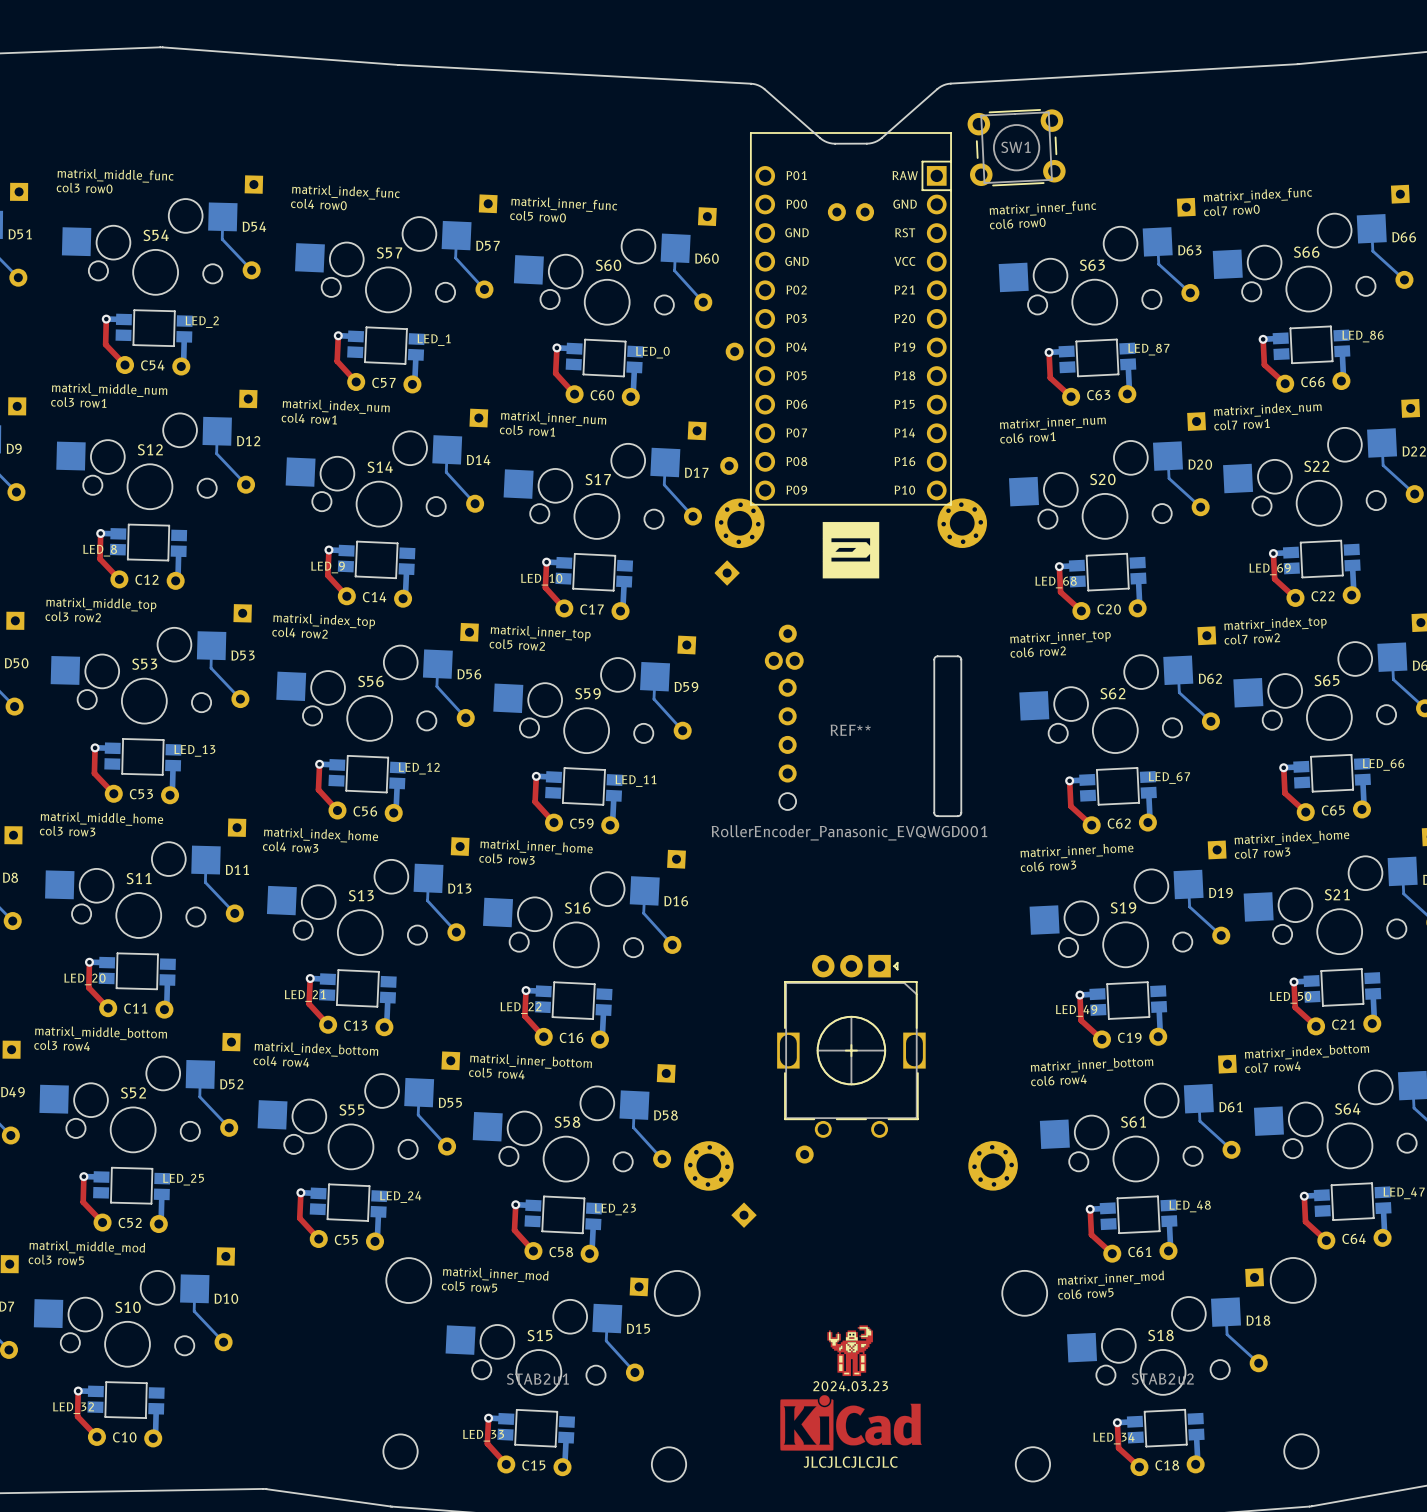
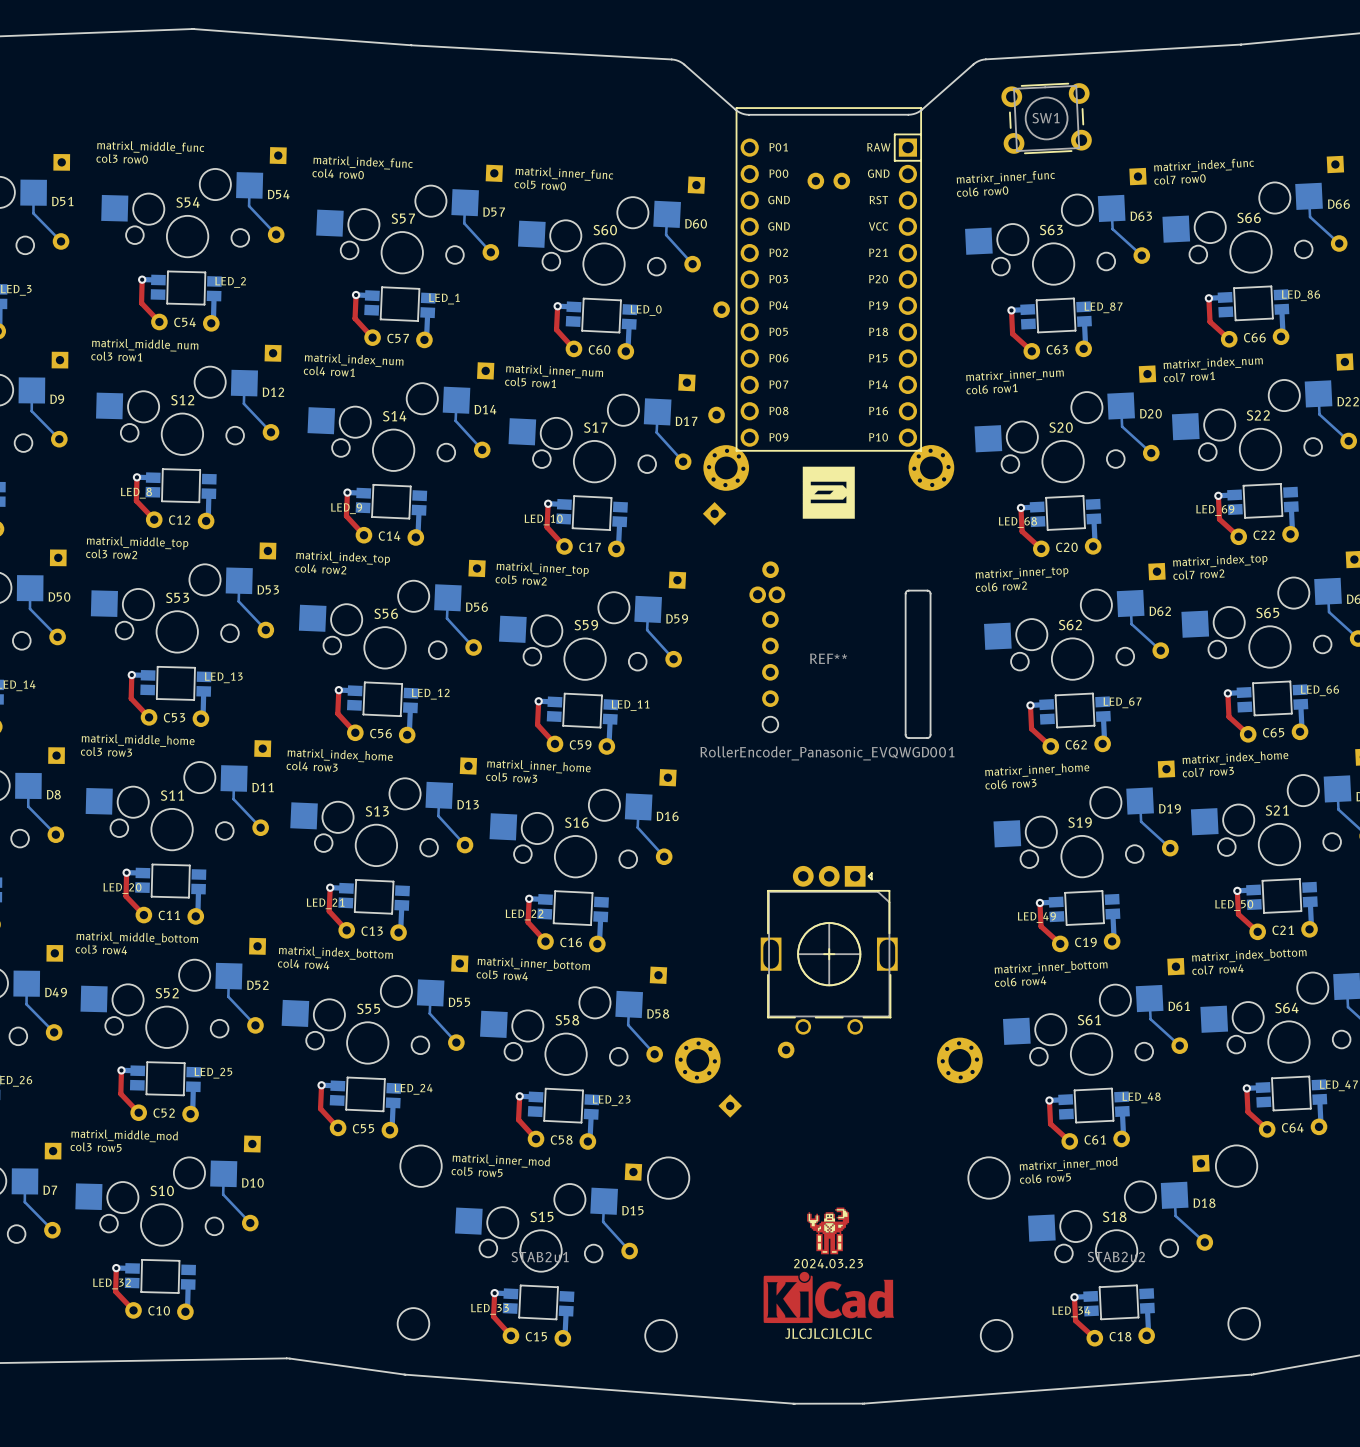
board edge: (1298, 64) (948, 83) (937, 89) (877, 141) (869, 143) (835, 143) (822, 139) (764, 89) (753, 83) (398, 64) -> (1241, 44) (983, 59) (973, 64) (920, 111) (908, 114) (746, 114) (737, 111) (684, 64) (674, 59) (411, 45)
SW1 position: (1016, 147) -> (1046, 118)

